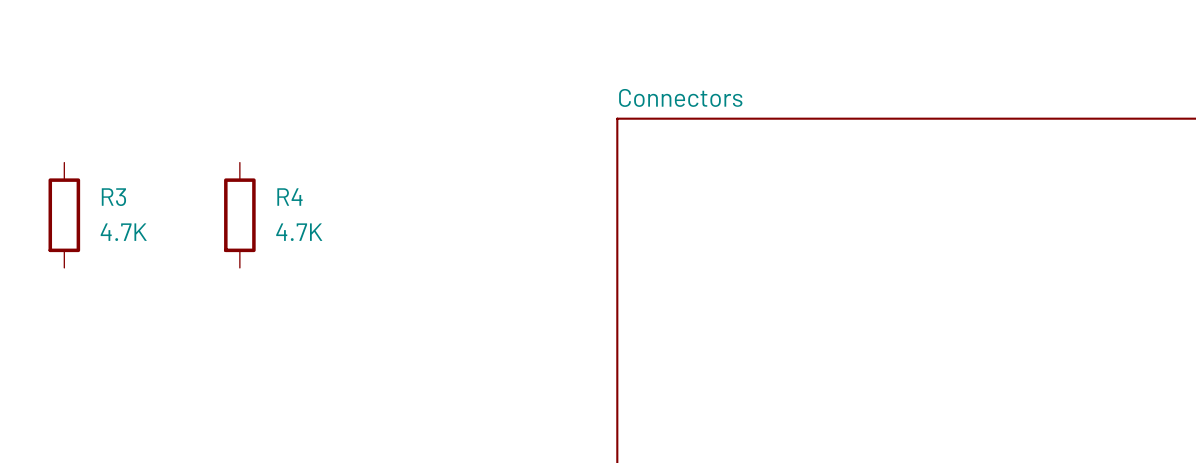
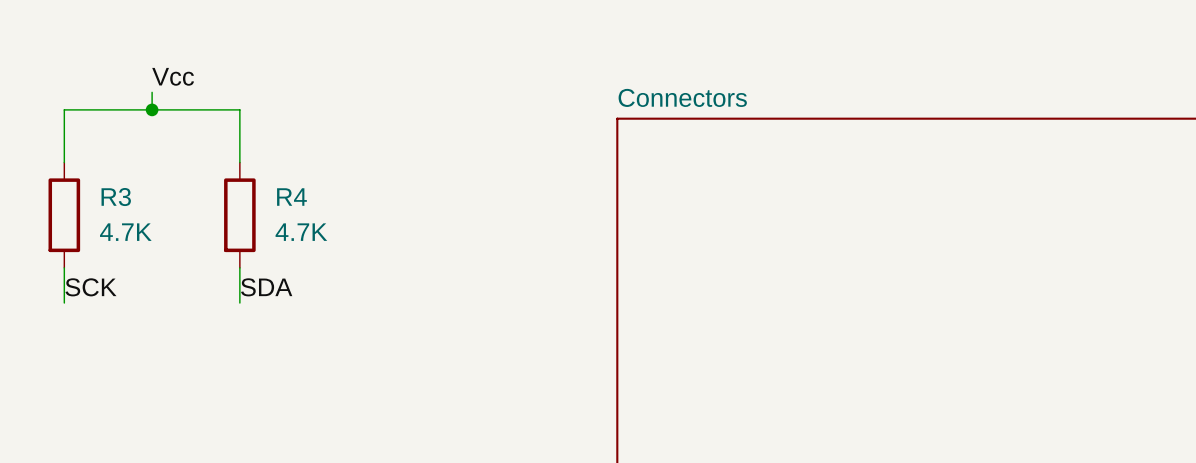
label: none -> Vcc (173, 76)
wire: none -> (152, 92) (152, 109)
junction: none -> (152, 109)
wire: none -> (64, 162) (64, 109) (239, 109) (239, 162)
wire: none -> (64, 267) (64, 303)
wire: none -> (239, 267) (239, 303)
label: none -> SCK (90, 287)
label: none -> SDA (266, 287)

